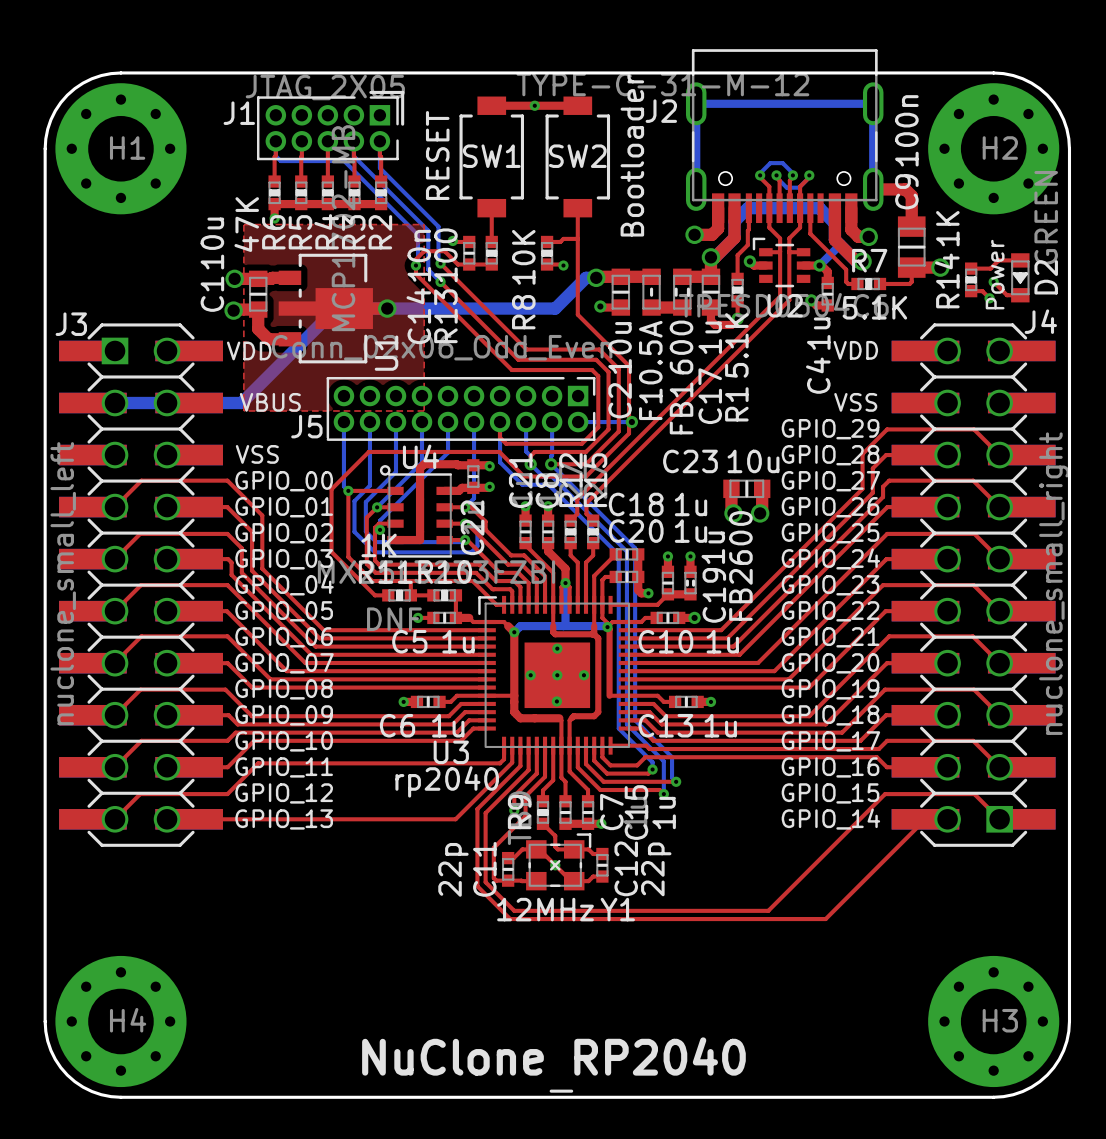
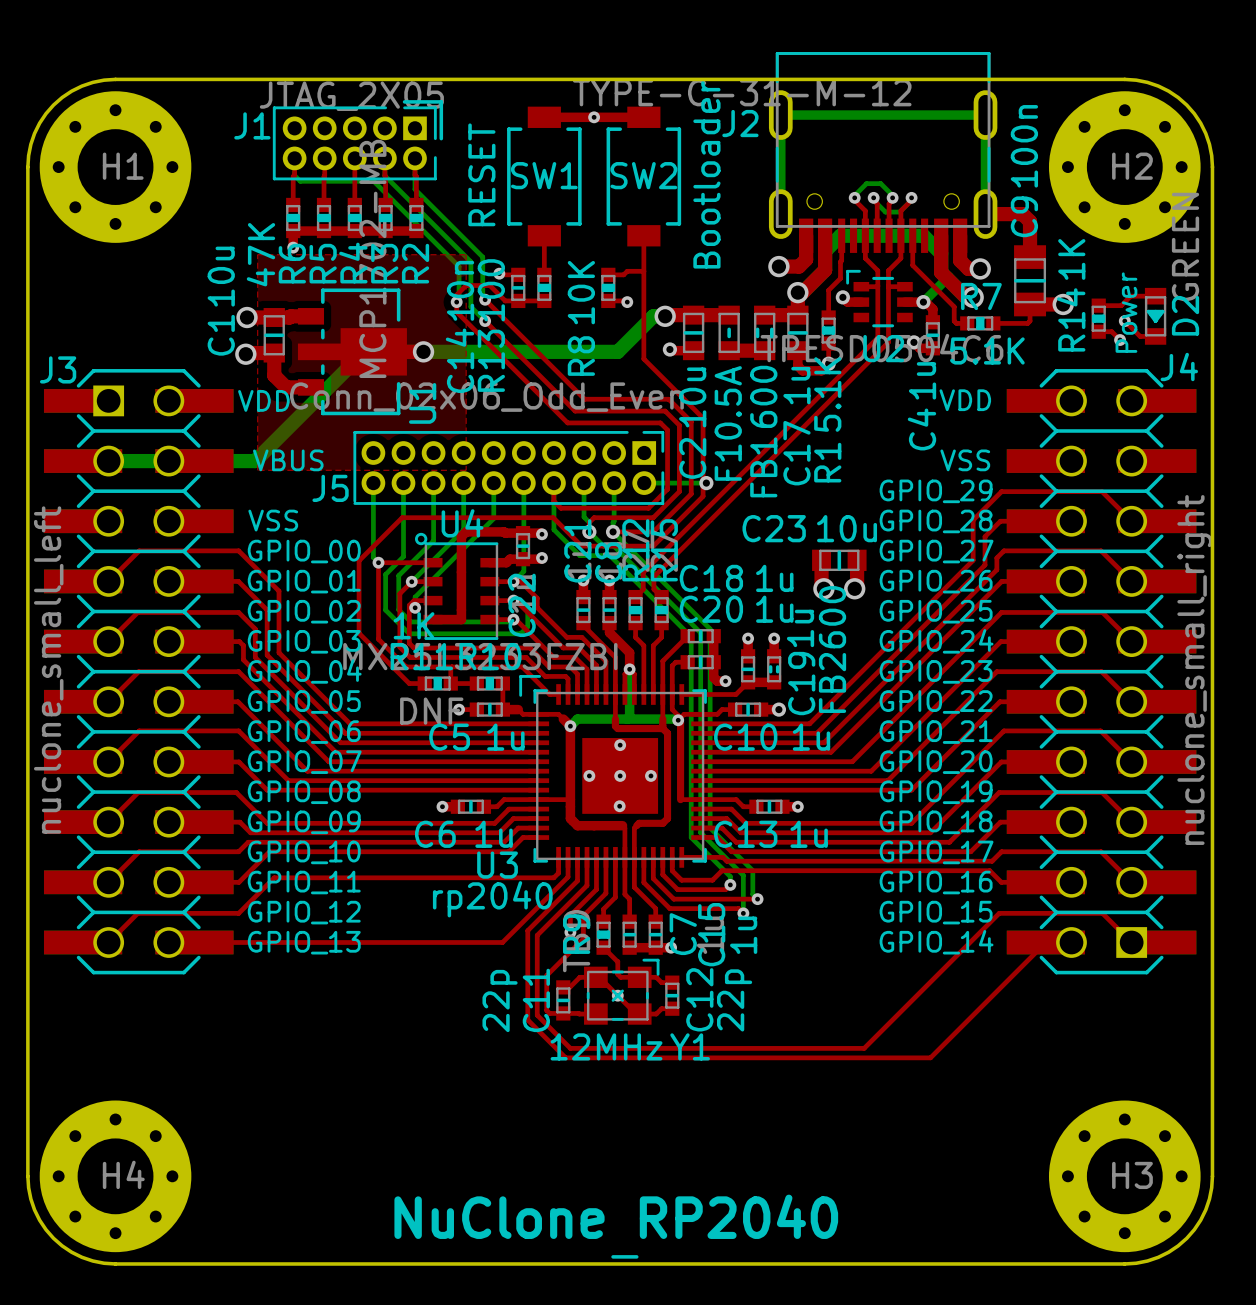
U3 footprint: [477, 595, 637, 755] -> [519, 675, 712, 868]

